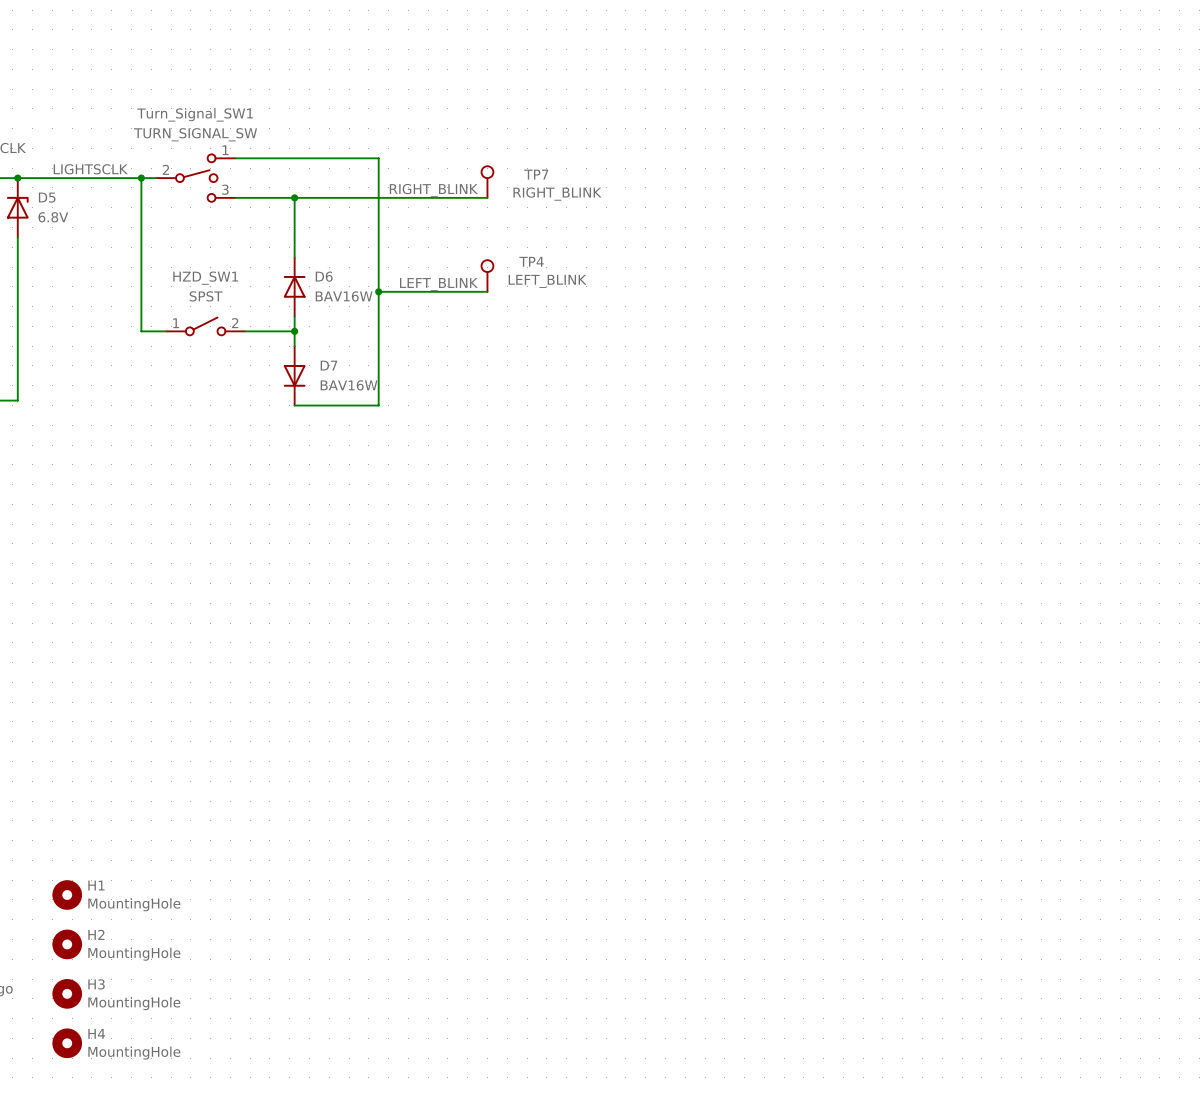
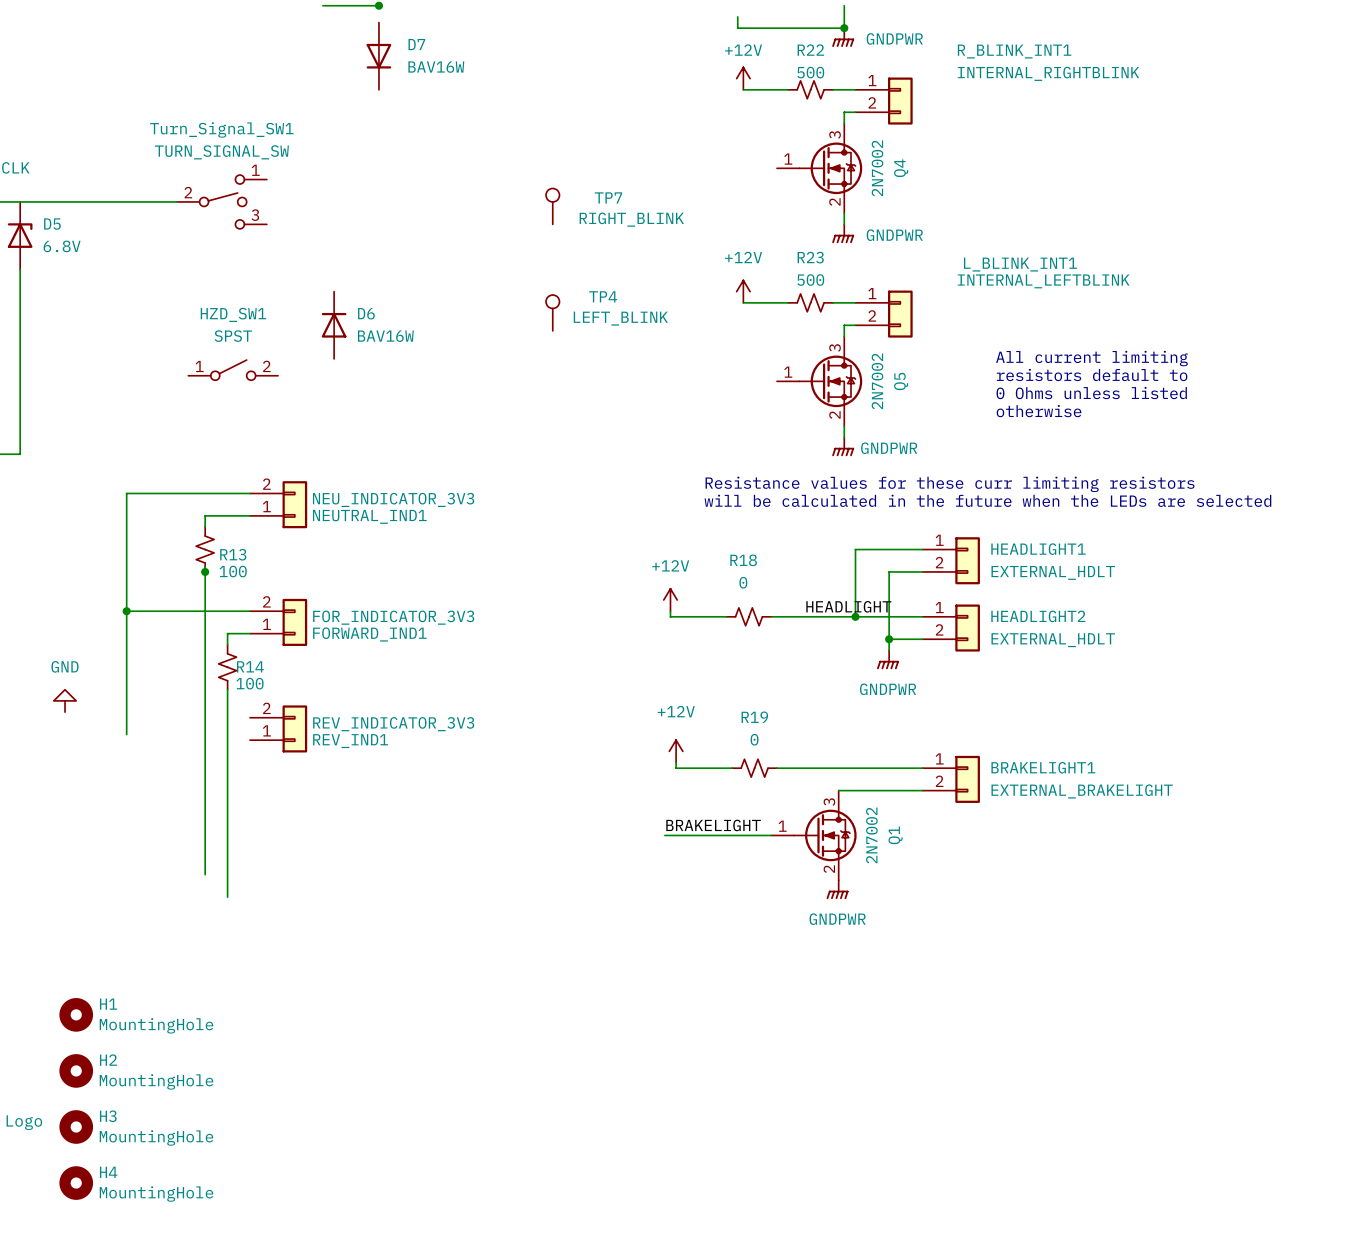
wire: none -> (322, 5) (378, 5)
junction: none -> (378, 5)
wire: none -> (844, 5) (844, 28) (737, 28) (737, 16)
junction: none -> (844, 28)
power symbol: none -> GNDPWR (843, 37)
power symbol: none -> +12V (743, 78)
wire: none -> (743, 89) (788, 89)
R22: none -> 500 (810, 89)
wire: none -> (833, 89) (855, 89)
R_BLINK_INT1: none -> INTERNAL_RIGHTBLINK (884, 101)
wire: none -> (855, 112) (844, 112) (844, 123)
Q4: none -> 2N7002 (819, 168)
wire: (235, 158) (378, 158) (378, 405) (294, 405) -> none
label: LIGHTSCLK (90, 169) -> none
junction: (17, 178) -> none
wire: (141, 178) (141, 331) (166, 331) -> none
junction: (141, 178) -> none
wire: none -> (844, 213) (844, 224)
label: RIGHT_BLINK (433, 190) -> none
wire: (235, 197) (487, 197) -> none
wire: (294, 197) (294, 257) -> none
junction: (294, 197) -> none
power symbol: none -> GNDPWR (843, 233)
power symbol: none -> +12V (743, 291)
wire: none -> (743, 302) (788, 302)
R23: none -> 500 (810, 302)
wire: none -> (833, 302) (855, 302)
L_BLINK_INT1: none -> INTERNAL_LEFTBLINK (884, 314)
label: LEFT_BLINK (438, 284) -> none
wire: none -> (855, 325) (844, 325) (844, 336)
wire: (378, 291) (487, 291) -> none
junction: (378, 291) -> none
wire: (294, 316) (294, 346) -> none
text: none -> All current limiting (1091, 358)
text: none -> resistors default to (1092, 375)
wire: (245, 331) (294, 331) -> none
junction: (294, 331) -> none
Q5: none -> 2N7002 (819, 381)
text: none -> 0 Ohms unless listed (1091, 393)
text: none -> otherwise (1039, 411)
D7 position: (294, 375) -> (378, 56)
wire: none -> (844, 426) (844, 437)
power symbol: none -> GNDPWR (843, 446)
text: none -> Resistance values for these curr limiting resistors (950, 484)
wire: none -> (250, 493) (126, 493) (126, 734)
text: none -> will be calculated in the future when the LEDs are selected (987, 500)
NEUTRAL_IND1: none -> NEU_INDICATOR_3V3 (278, 504)
wire: none -> (250, 515) (205, 515) (205, 527)
R13: none -> 100 (205, 549)
wire: none -> (922, 549) (855, 549) (855, 616)
HEADLIGHT1: none -> EXTERNAL_HDLT (951, 560)
wire: none -> (205, 566) (205, 874)
junction: none -> (205, 571)
wire: none -> (922, 571) (889, 571) (889, 650)
power symbol: none -> +12V (670, 600)
label: none -> HEADLIGHT (848, 606)
wire: none -> (126, 611) (250, 611)
junction: none -> (126, 611)
wire: none -> (670, 611) (670, 616) (726, 616)
R18: none -> 0 (748, 616)
wire: none -> (771, 616) (922, 616)
junction: none -> (855, 616)
FORWARD_IND1: none -> FOR_INDICATOR_3V3 (278, 622)
HEADLIGHT2: none -> EXTERNAL_HDLT (951, 628)
wire: none -> (250, 633) (227, 633) (227, 644)
wire: none -> (889, 639) (922, 639)
junction: none -> (889, 639)
power symbol: none -> GNDPWR (888, 659)
R14: none -> 100 (227, 667)
wire: none -> (227, 689) (227, 897)
power symbol: none -> GND (65, 700)
REV_IND1: none -> REV_INDICATOR_3V3 (278, 728)
power symbol: none -> +12V (676, 751)
wire: none -> (676, 762) (676, 768) (732, 768)
R19: none -> 0 (754, 768)
wire: none -> (777, 768) (922, 768)
BRAKELIGHT1: none -> EXTERNAL_BRAKELIGHT (951, 779)
wire: none -> (838, 790) (922, 790)
label: none -> BRAKELIGHT (713, 825)
wire: none -> (664, 835) (771, 835)
Q1: none -> 2N7002 (814, 835)
power symbol: none -> GNDPWR (837, 889)

